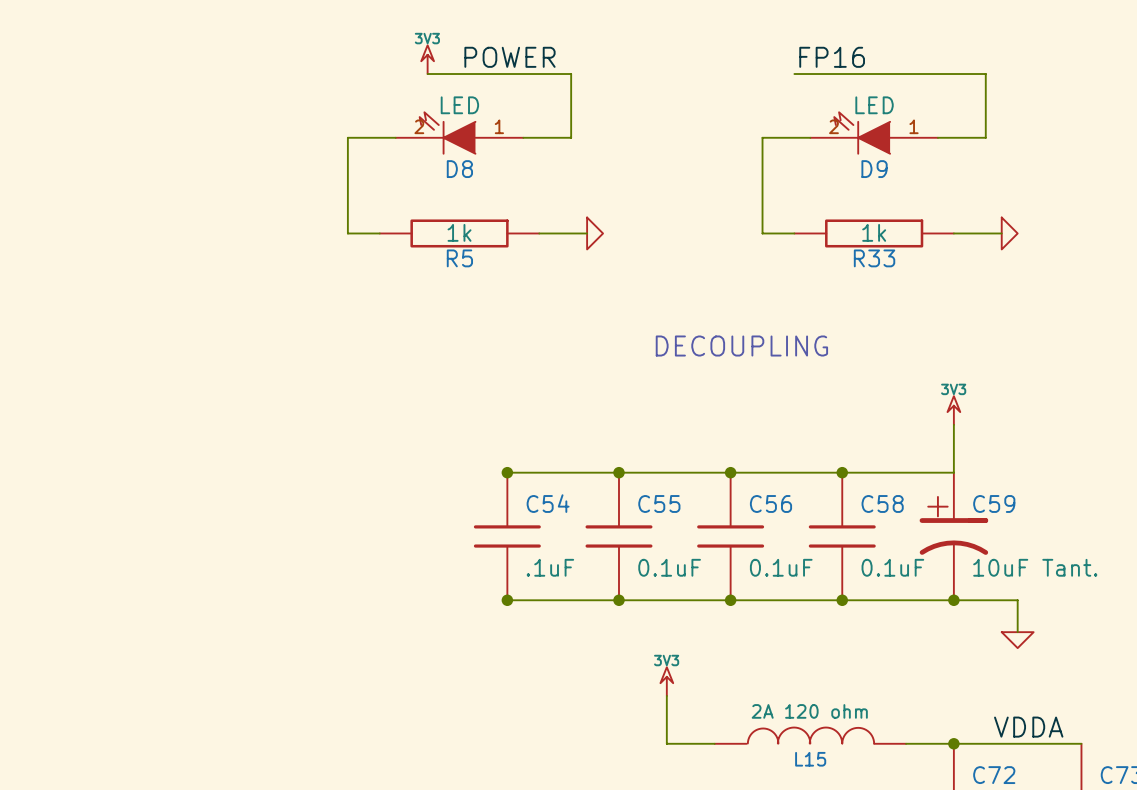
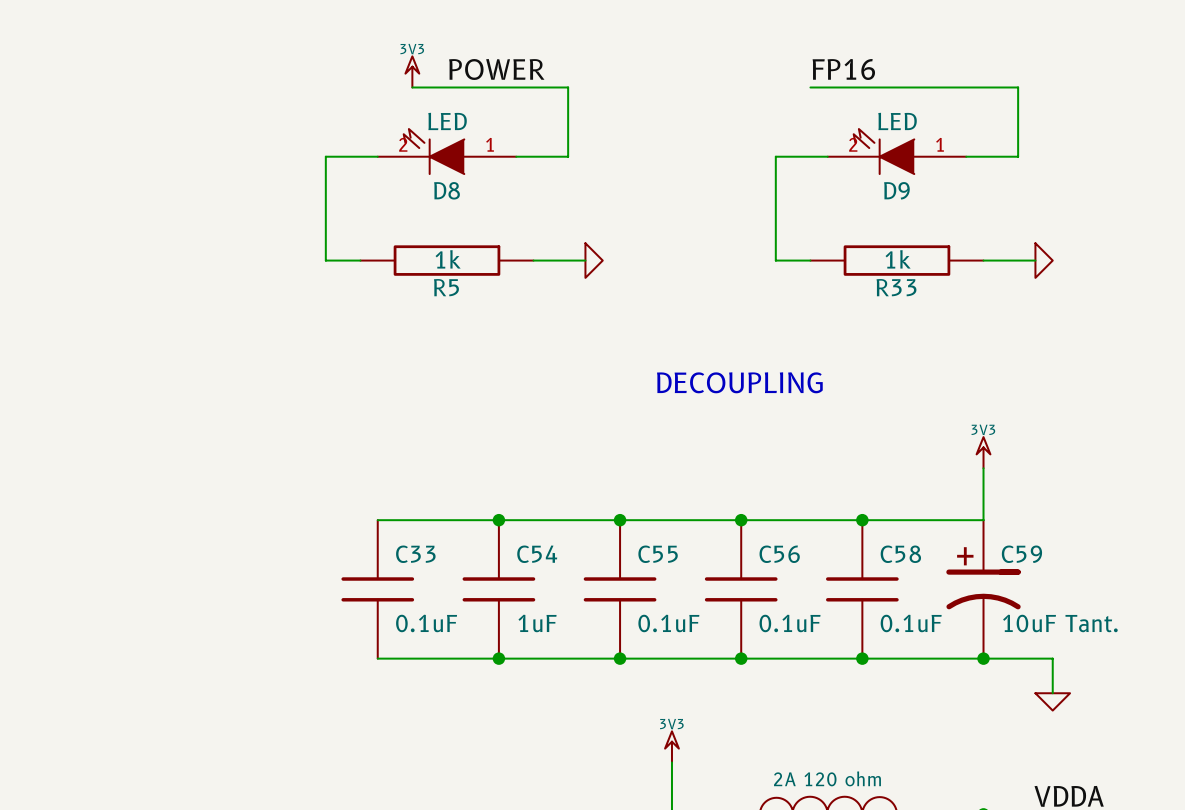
wire: none -> (377, 520) (498, 520)
C33: none -> 0.1uF (377, 589)
C54 value: .1uF (550, 567) -> 1uF (537, 623)
wire: none -> (377, 658) (498, 658)

